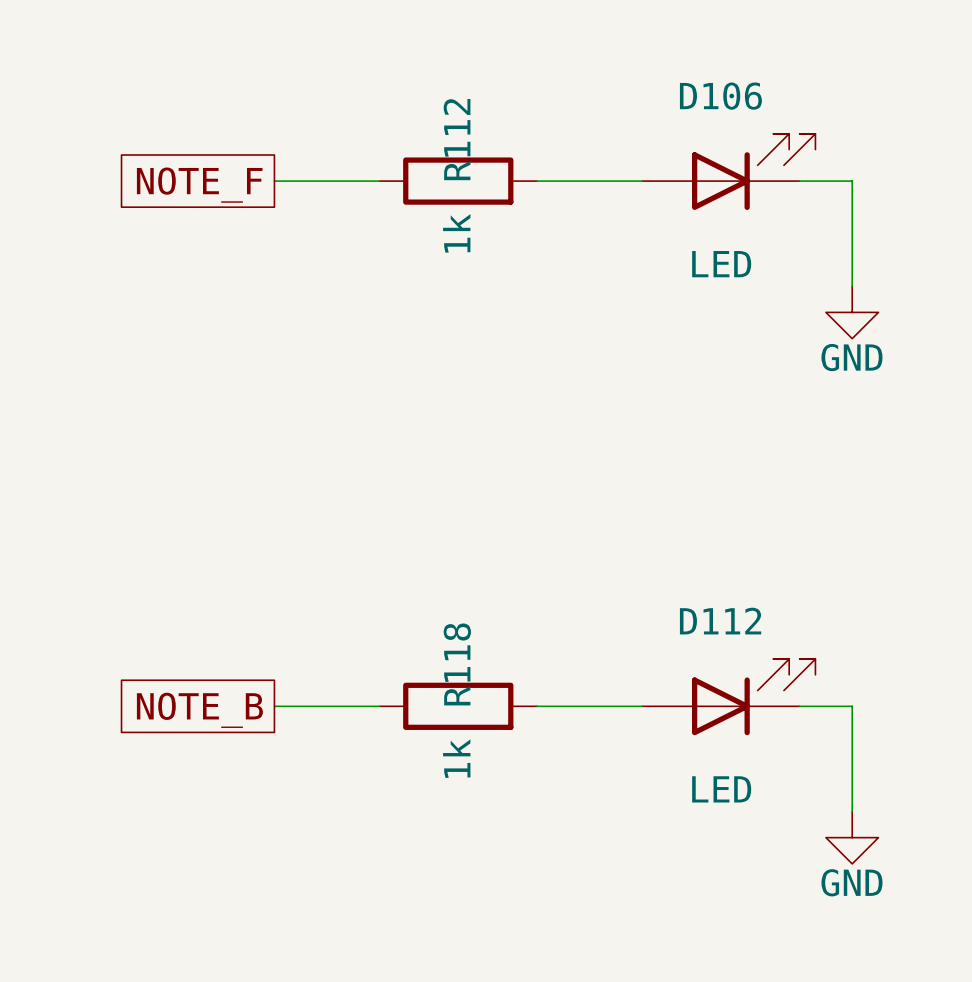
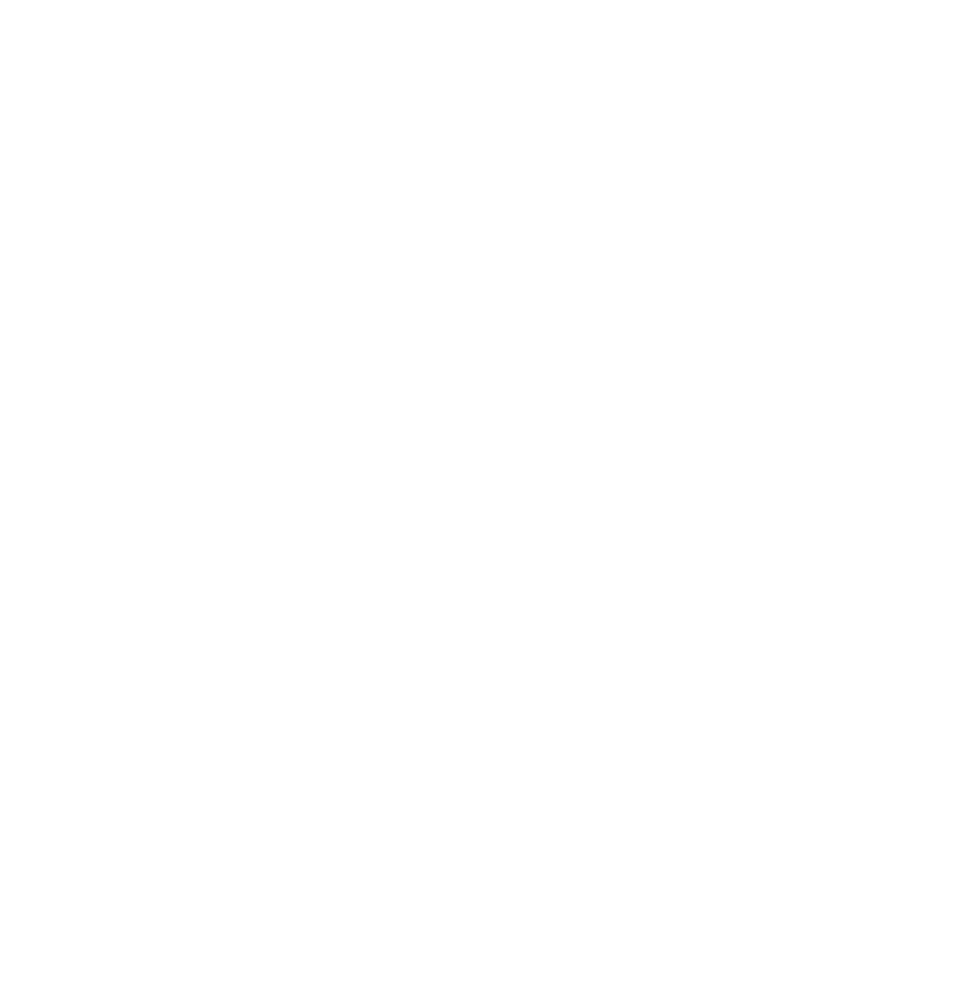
D106: LED (728, 171) -> none
wire: (274, 181) (379, 181) -> none
R112: 1k (458, 181) -> none
wire: (537, 181) (642, 181) -> none
wire: (799, 181) (852, 181) (852, 286) -> none
global label: NOTE_F (199, 185) -> none
power symbol: GND (852, 312) -> none
D112: LED (728, 697) -> none
wire: (274, 706) (379, 706) -> none
R118: 1k (458, 706) -> none
wire: (537, 706) (642, 706) -> none
wire: (799, 706) (852, 706) (852, 811) -> none
global label: NOTE_B (199, 710) -> none
power symbol: GND (852, 837) -> none

